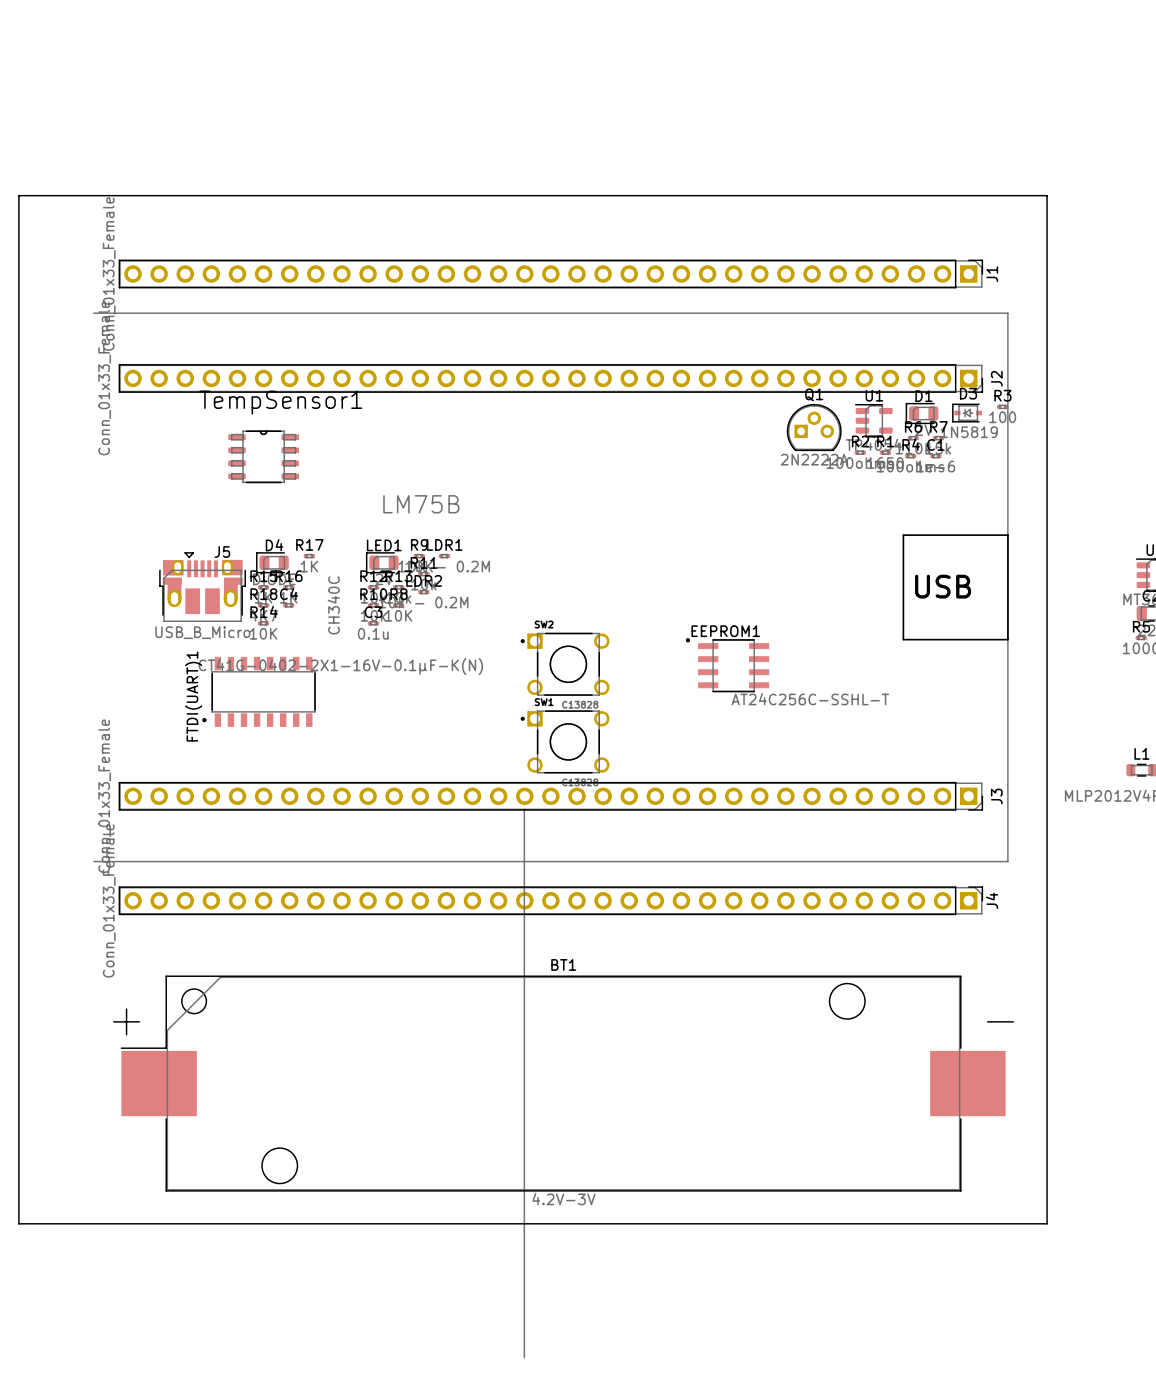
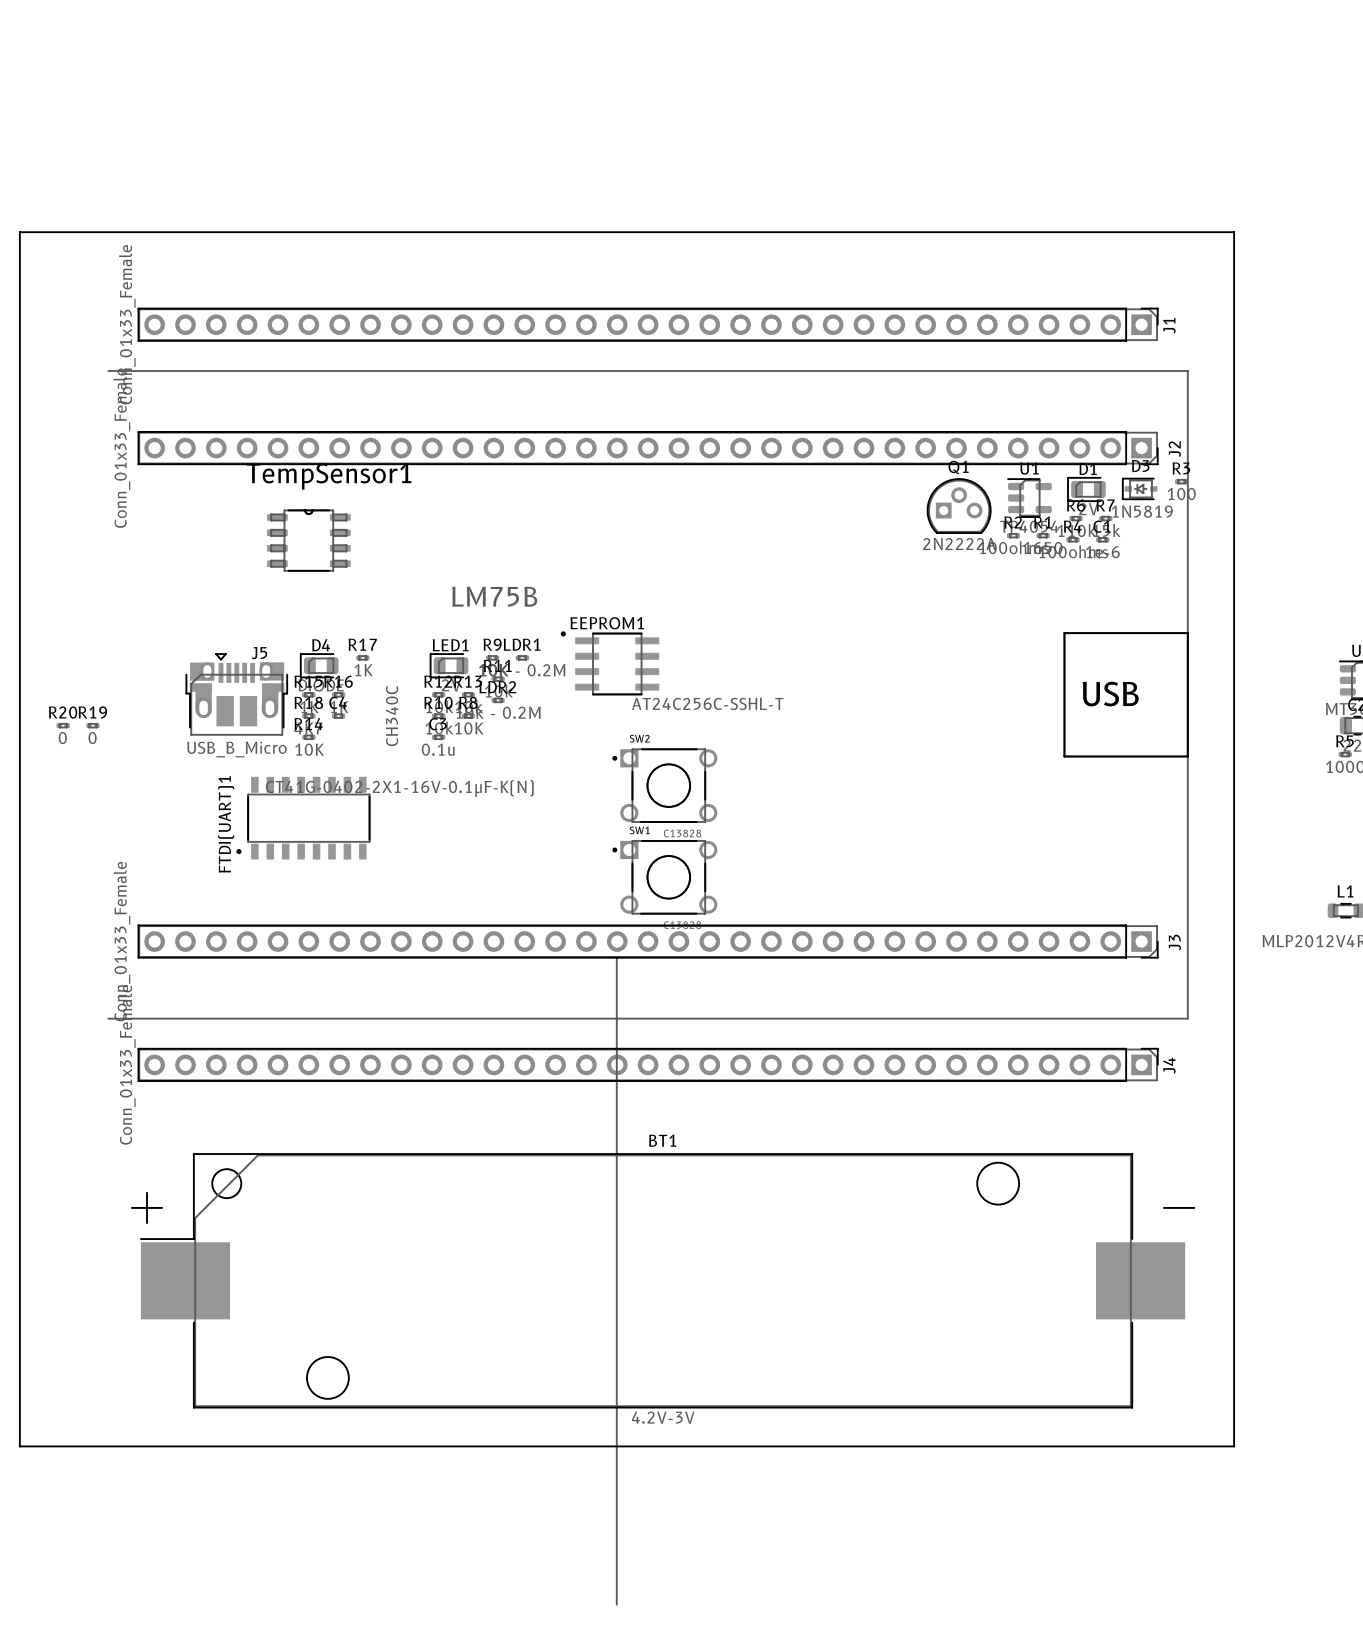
R20: none -> 0 (63, 725)
R19: none -> 0 (92, 725)
EEPROM1 position: (727, 665) -> (610, 663)

